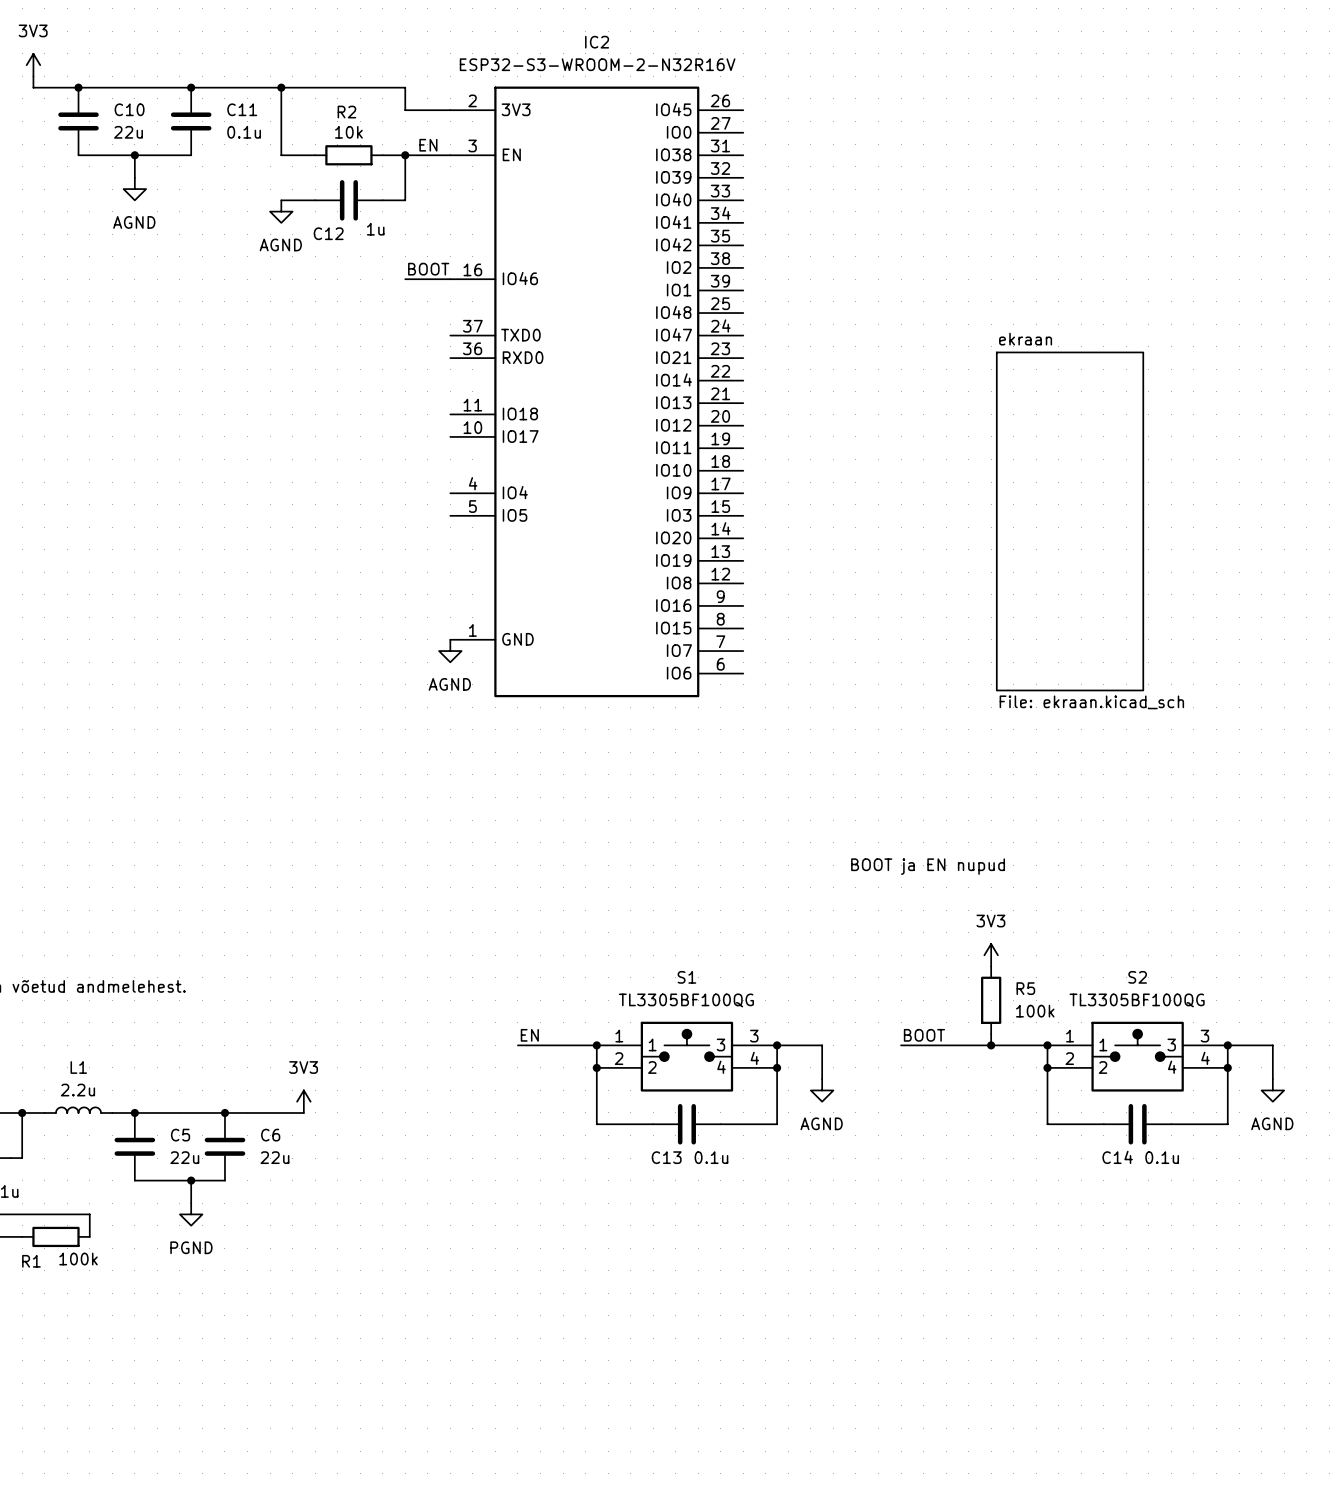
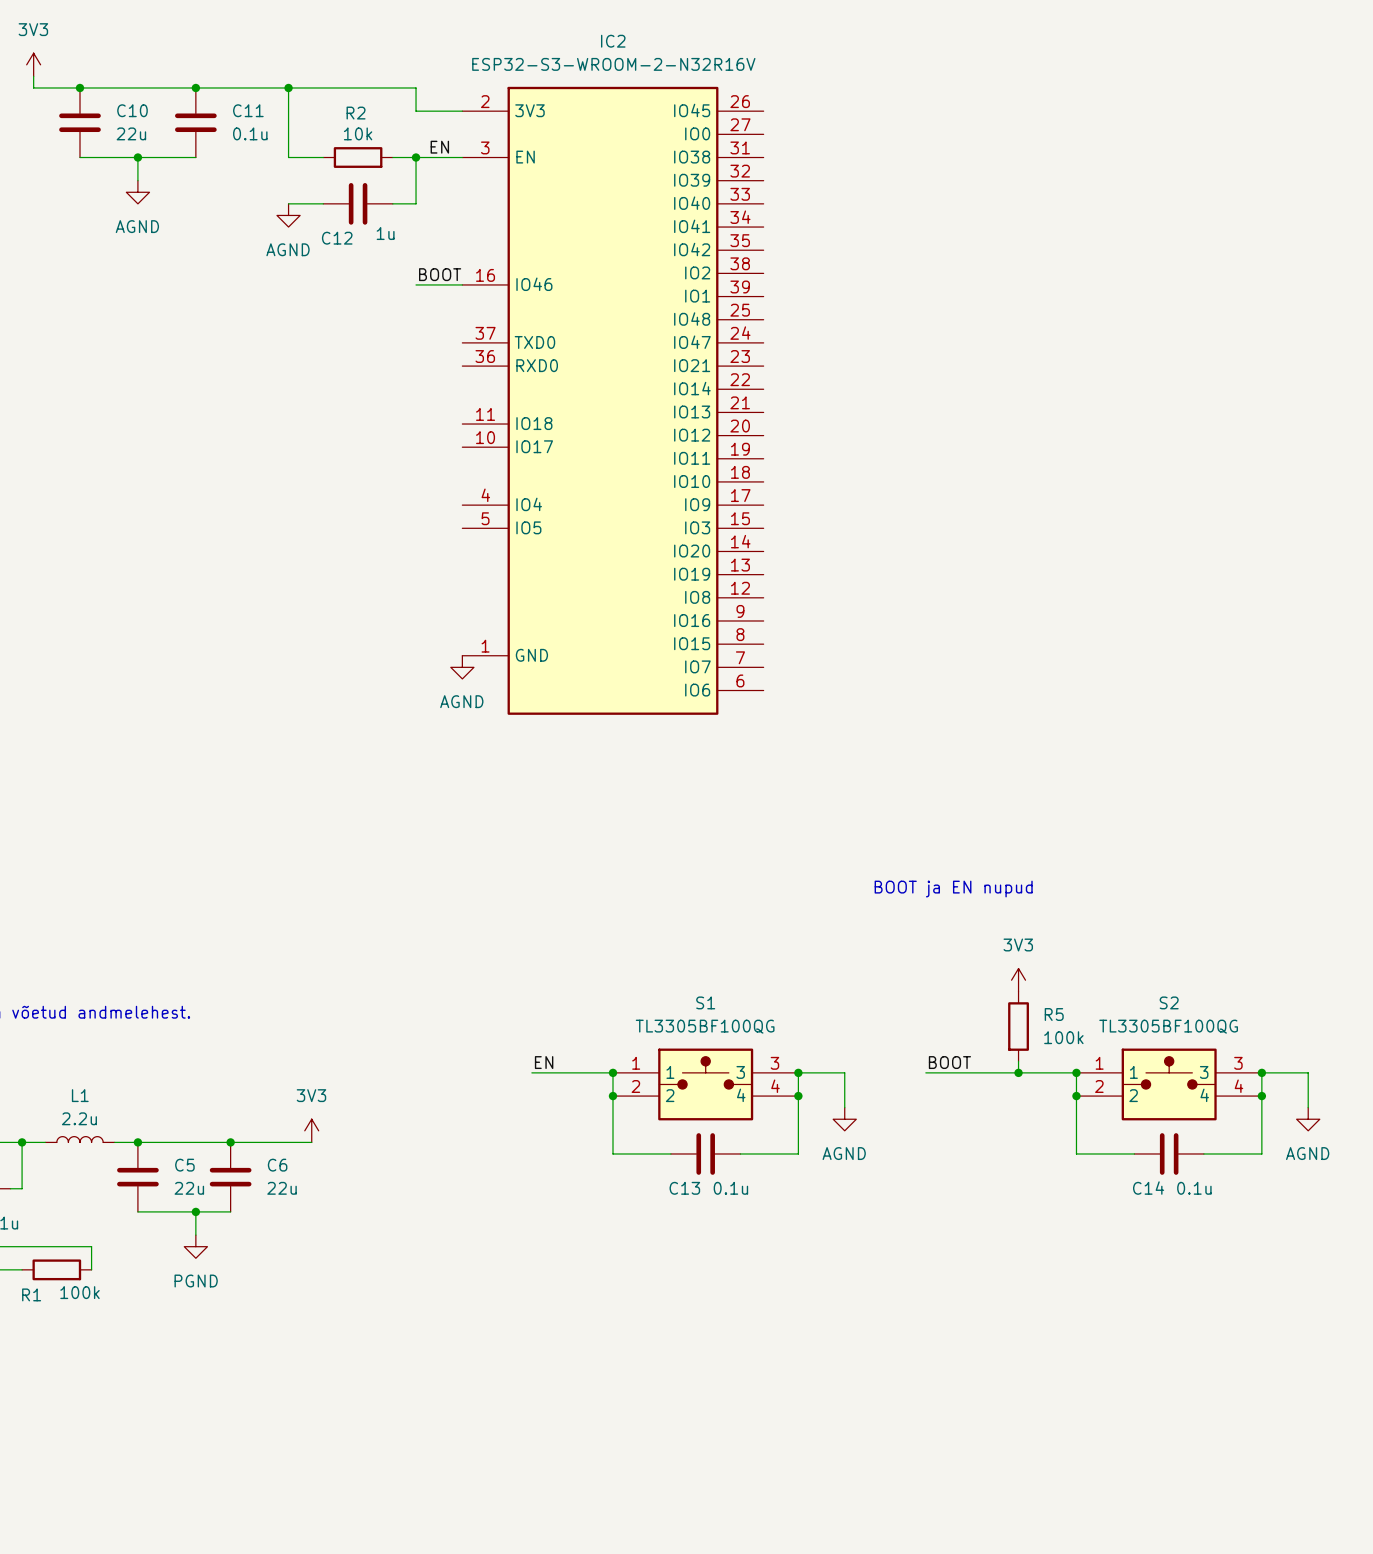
sheet ekraan: File: ekraan.kicad_sch (1070, 521) -> none

